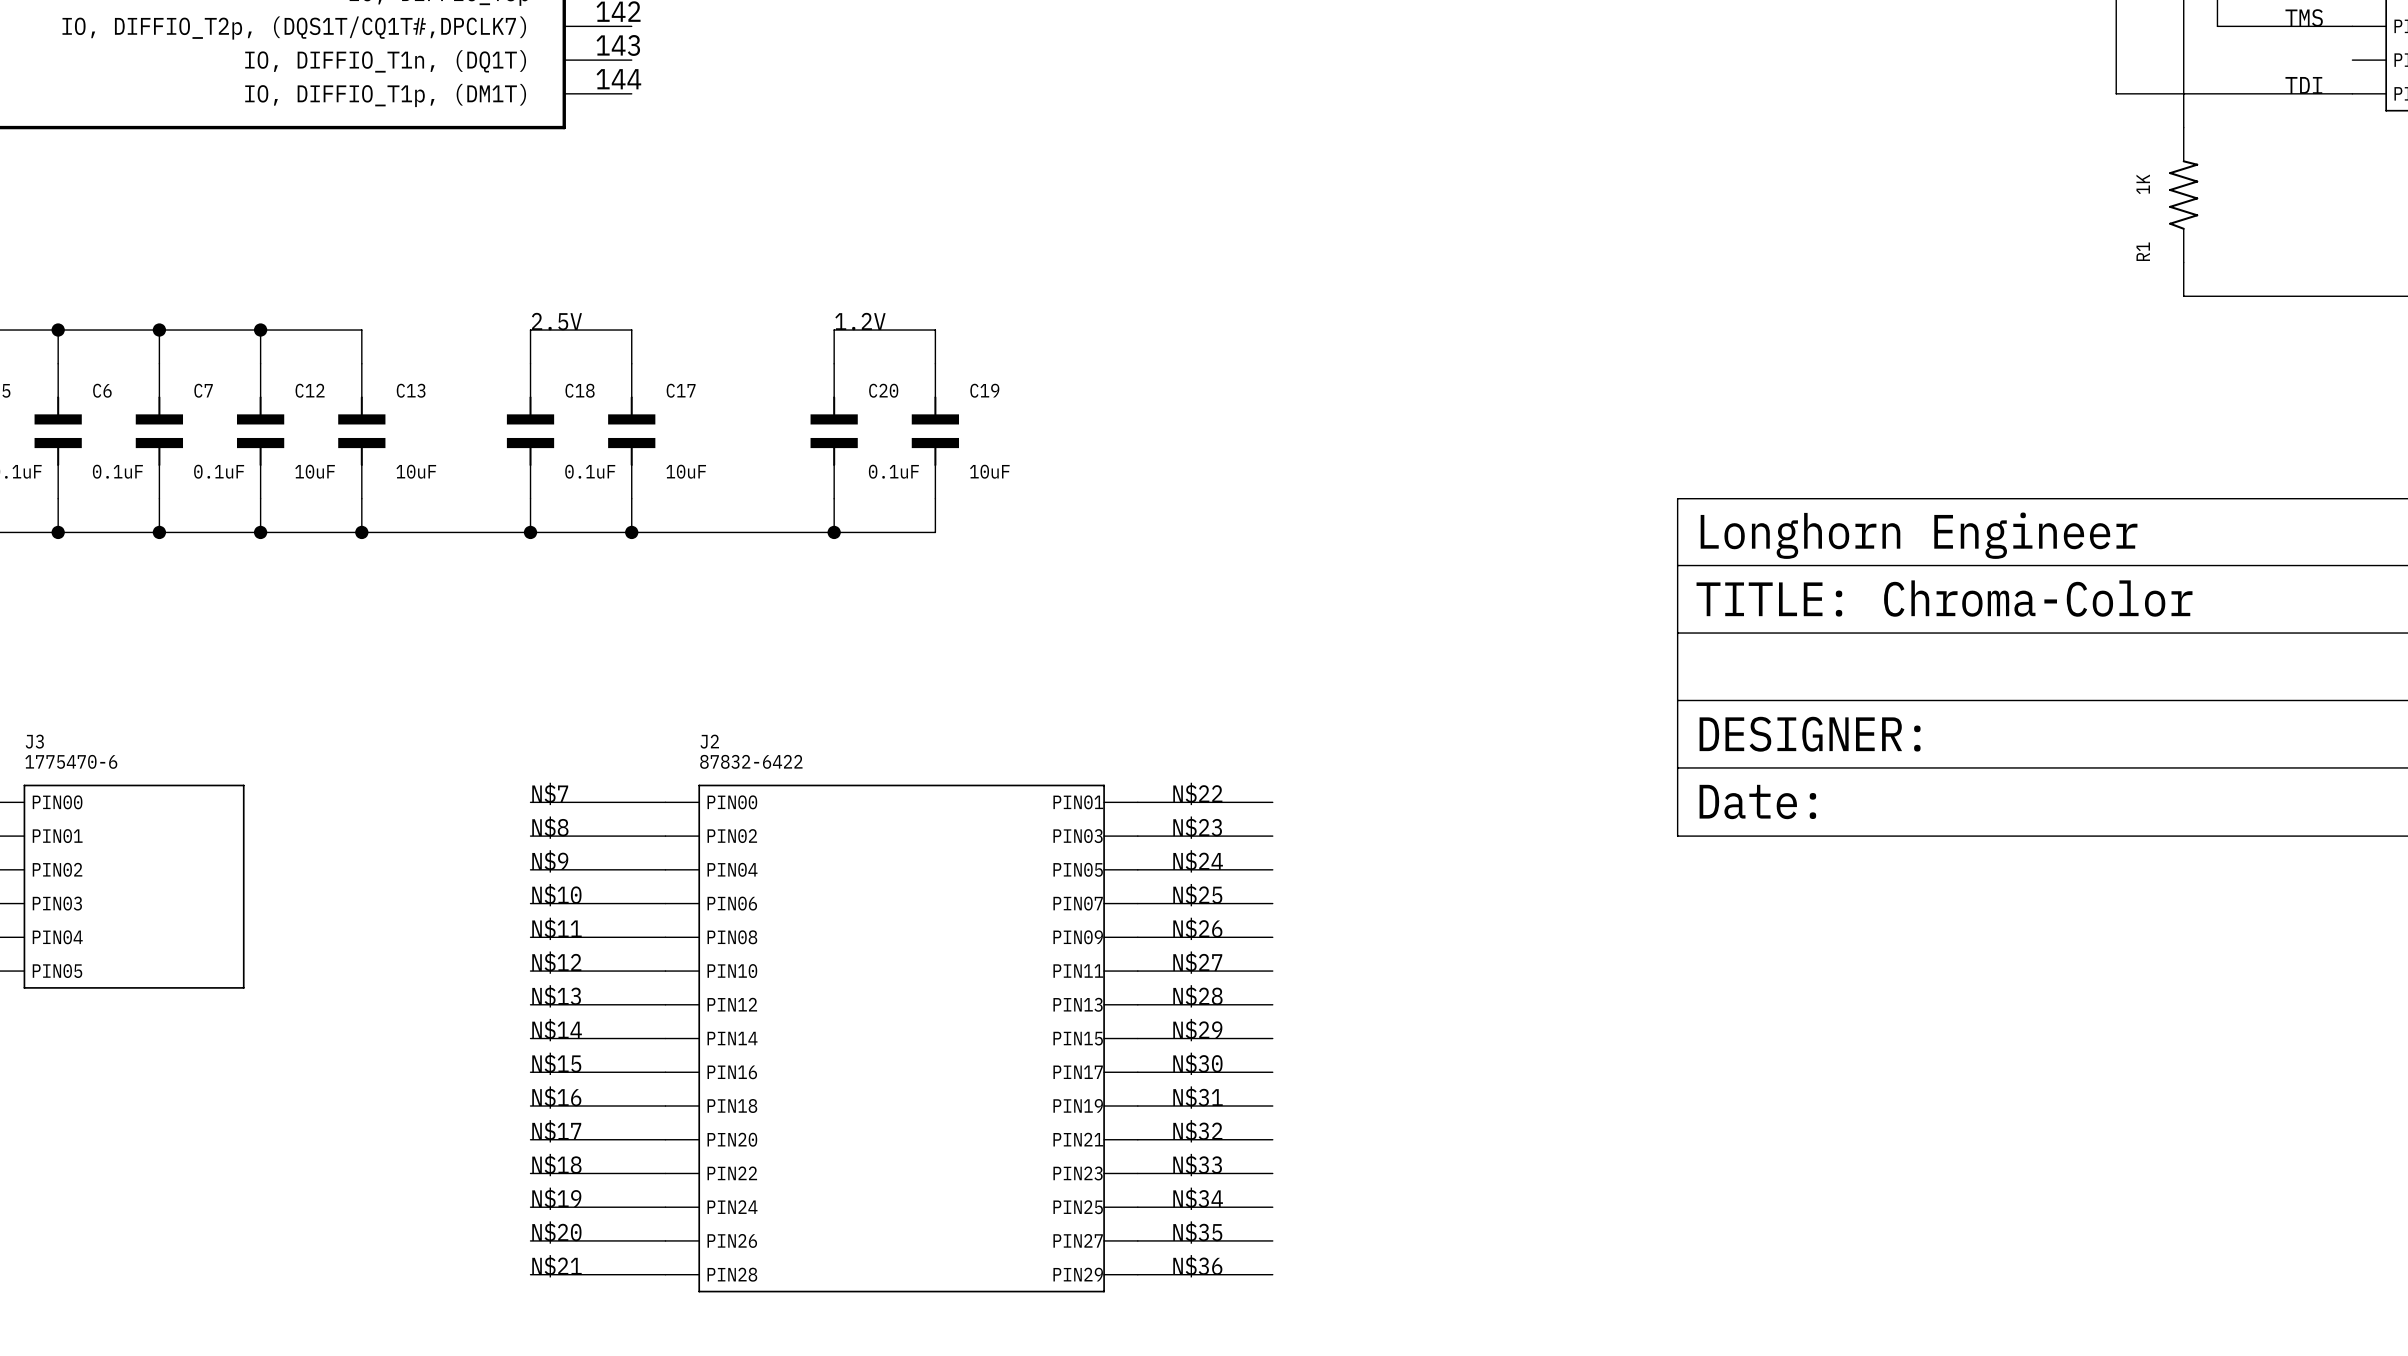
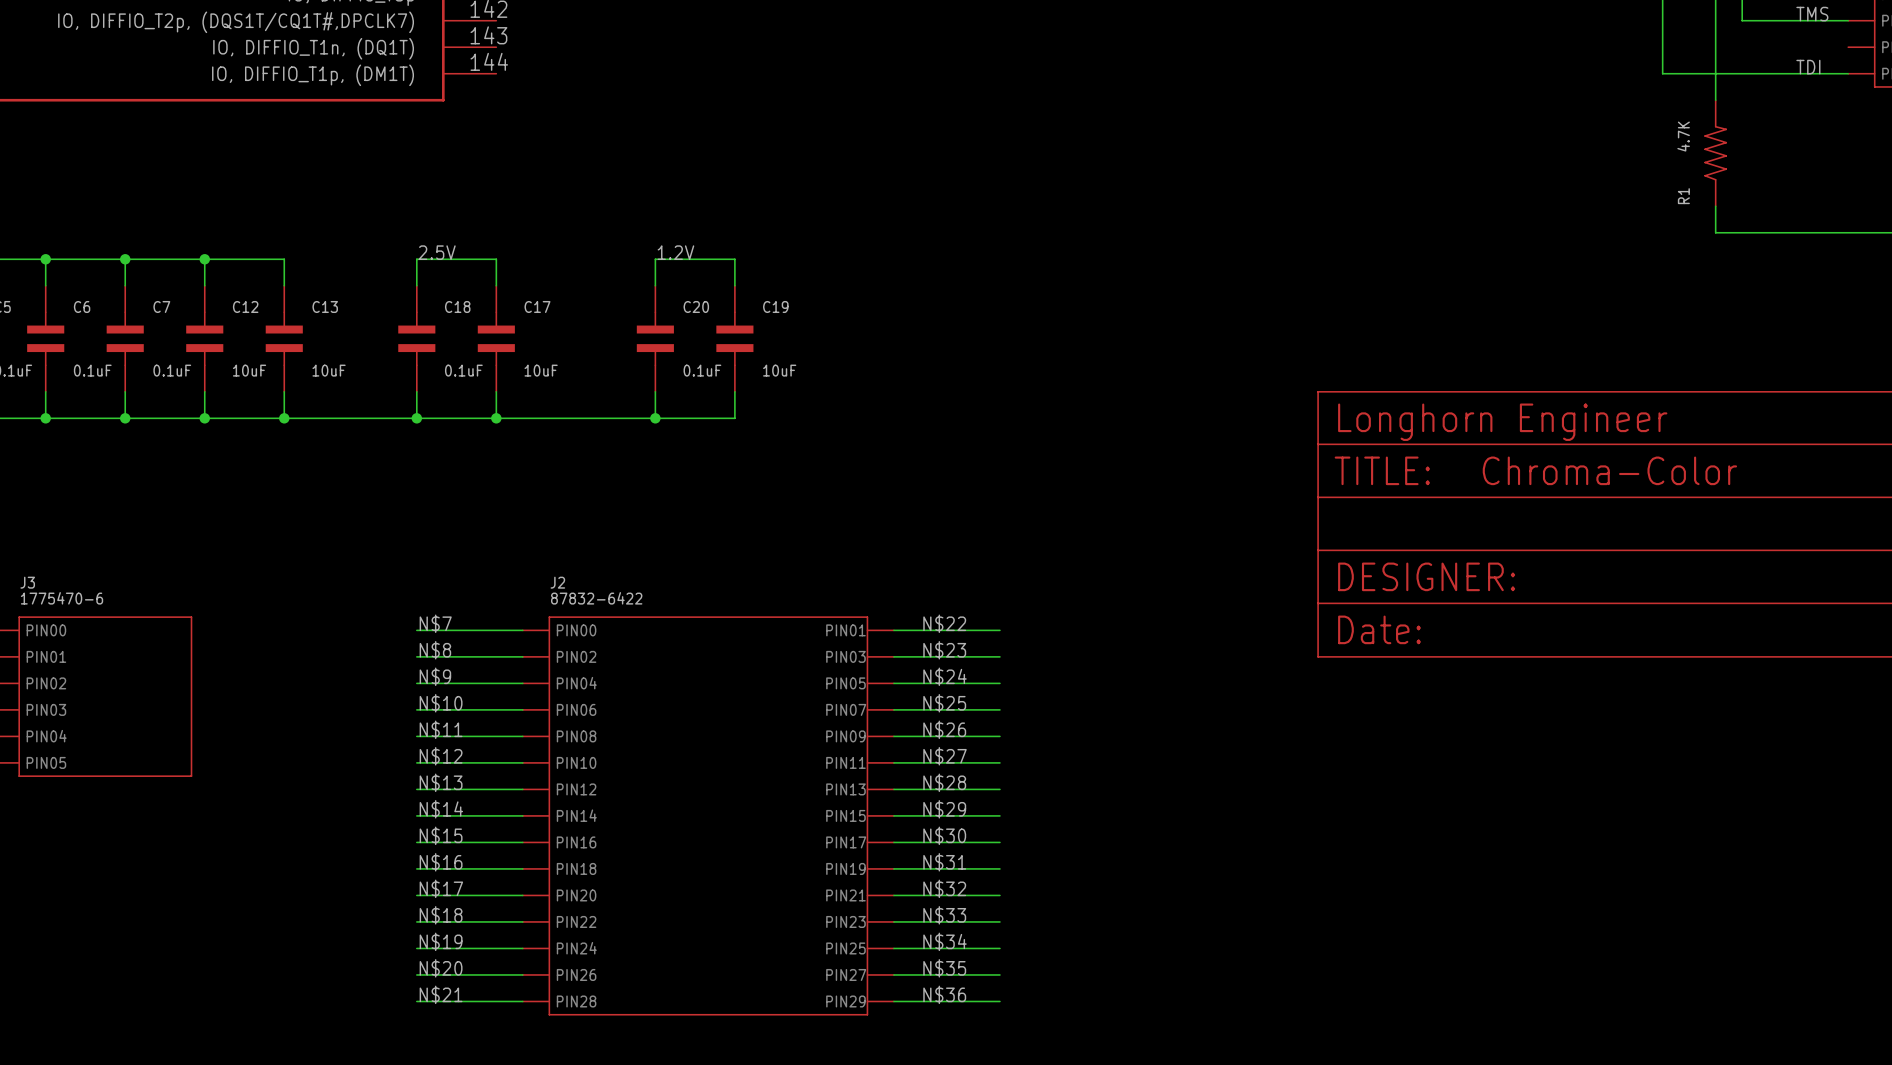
R1 value: 1K (2143, 184) -> 4.7K (1683, 136)

